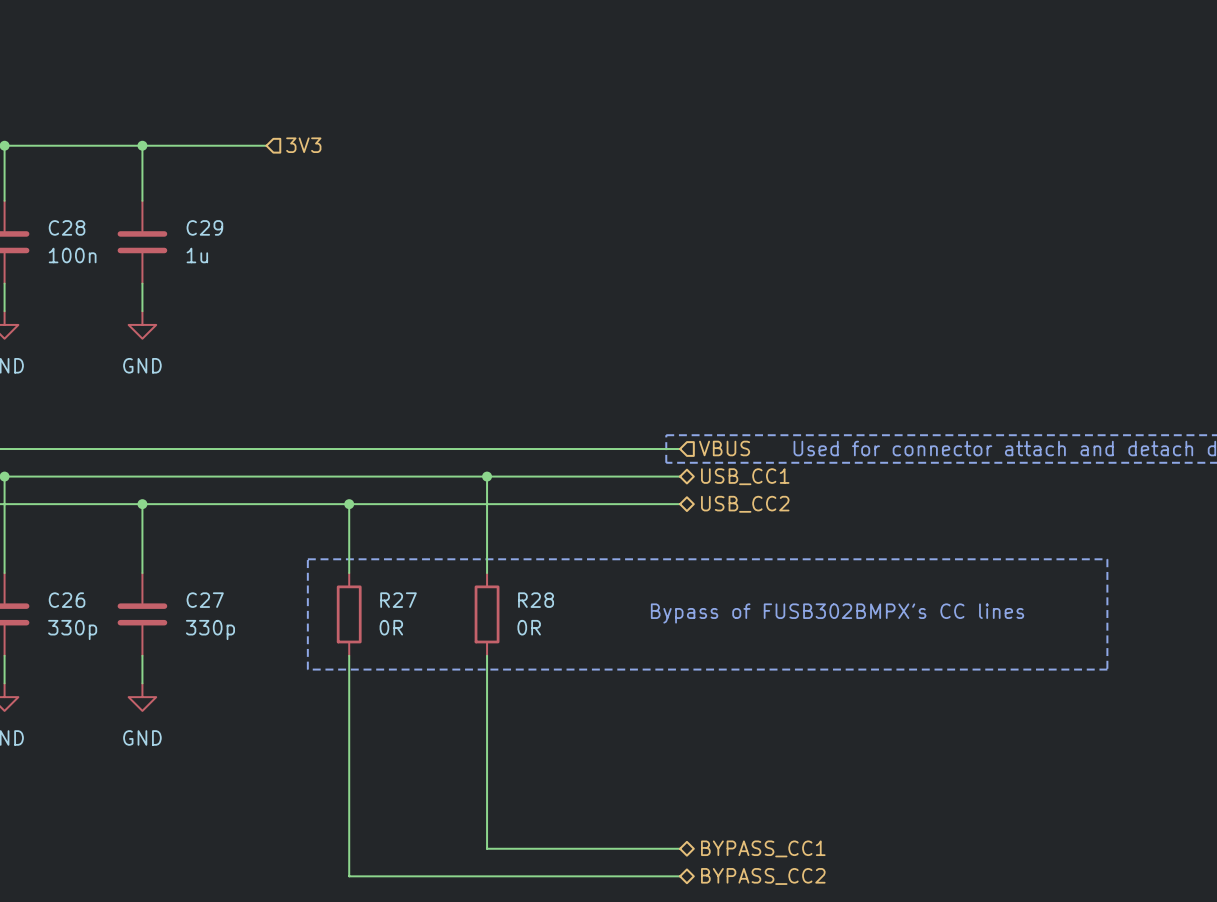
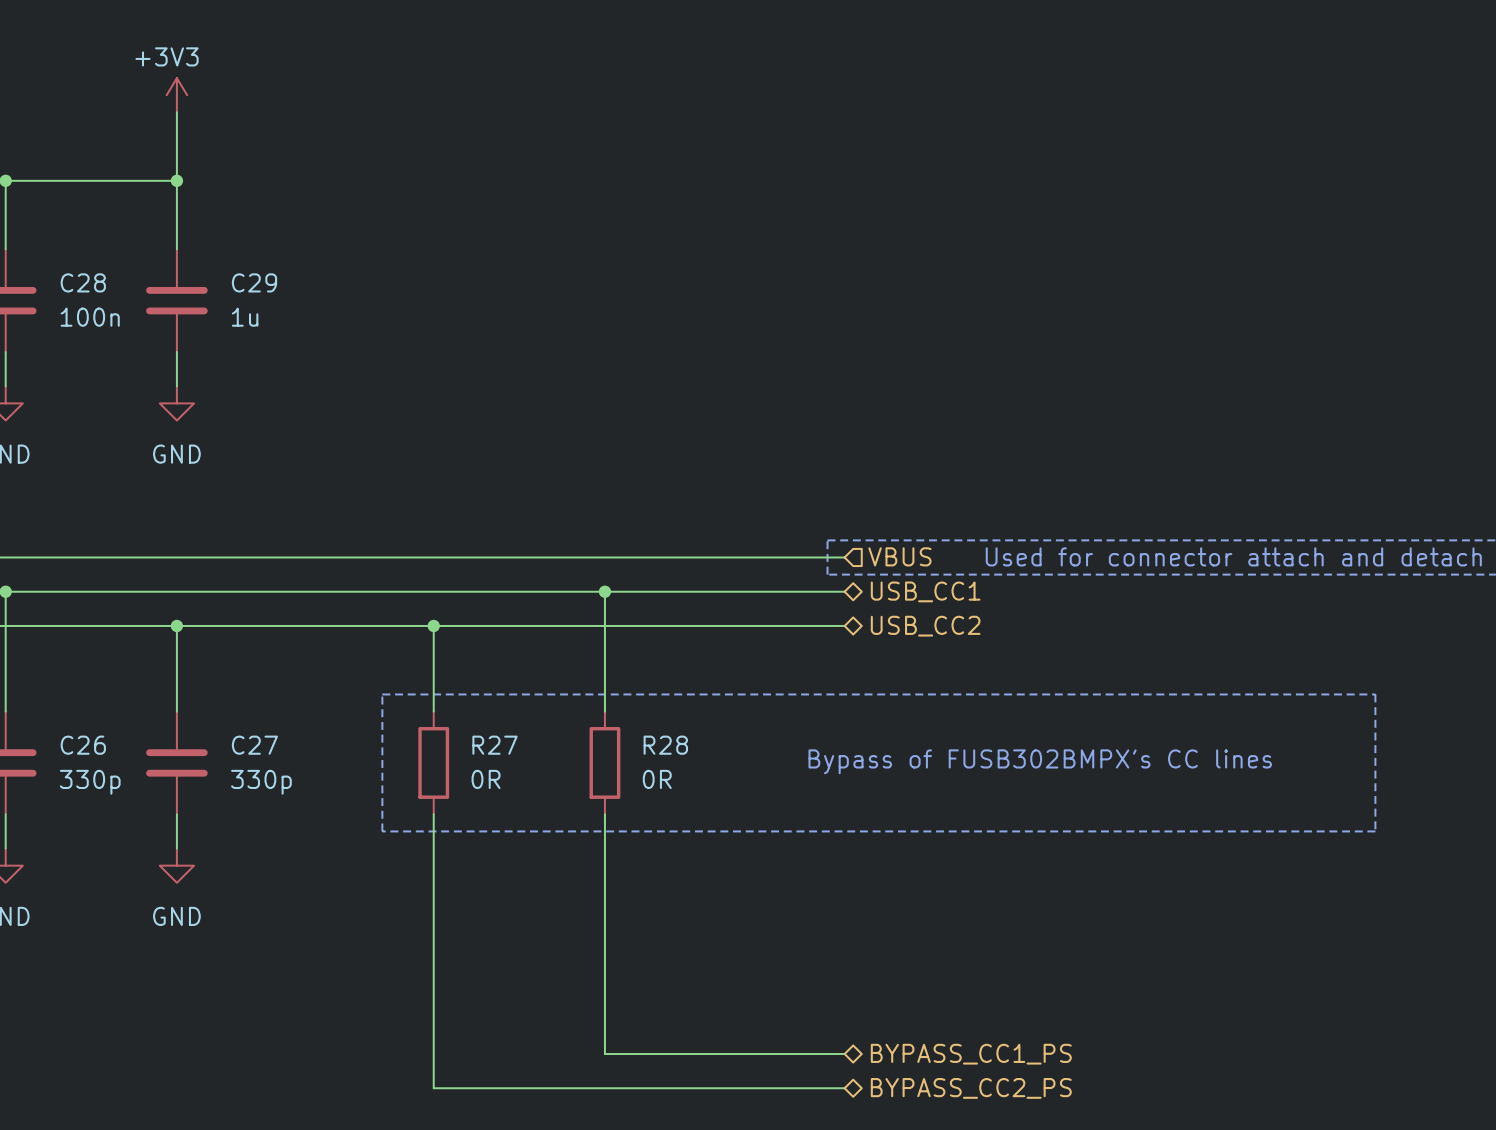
power symbol: none -> +3V3 (176, 95)
wire: (142, 145) (266, 145) -> (176, 180) (176, 112)
hierarchical label: 3V3 (303, 145) -> none
hierarchical label: BYPASS_CC1 (763, 848) -> BYPASS_CC1_PS (971, 1054)
hierarchical label: BYPASS_CC2 (763, 876) -> BYPASS_CC2_PS (971, 1088)

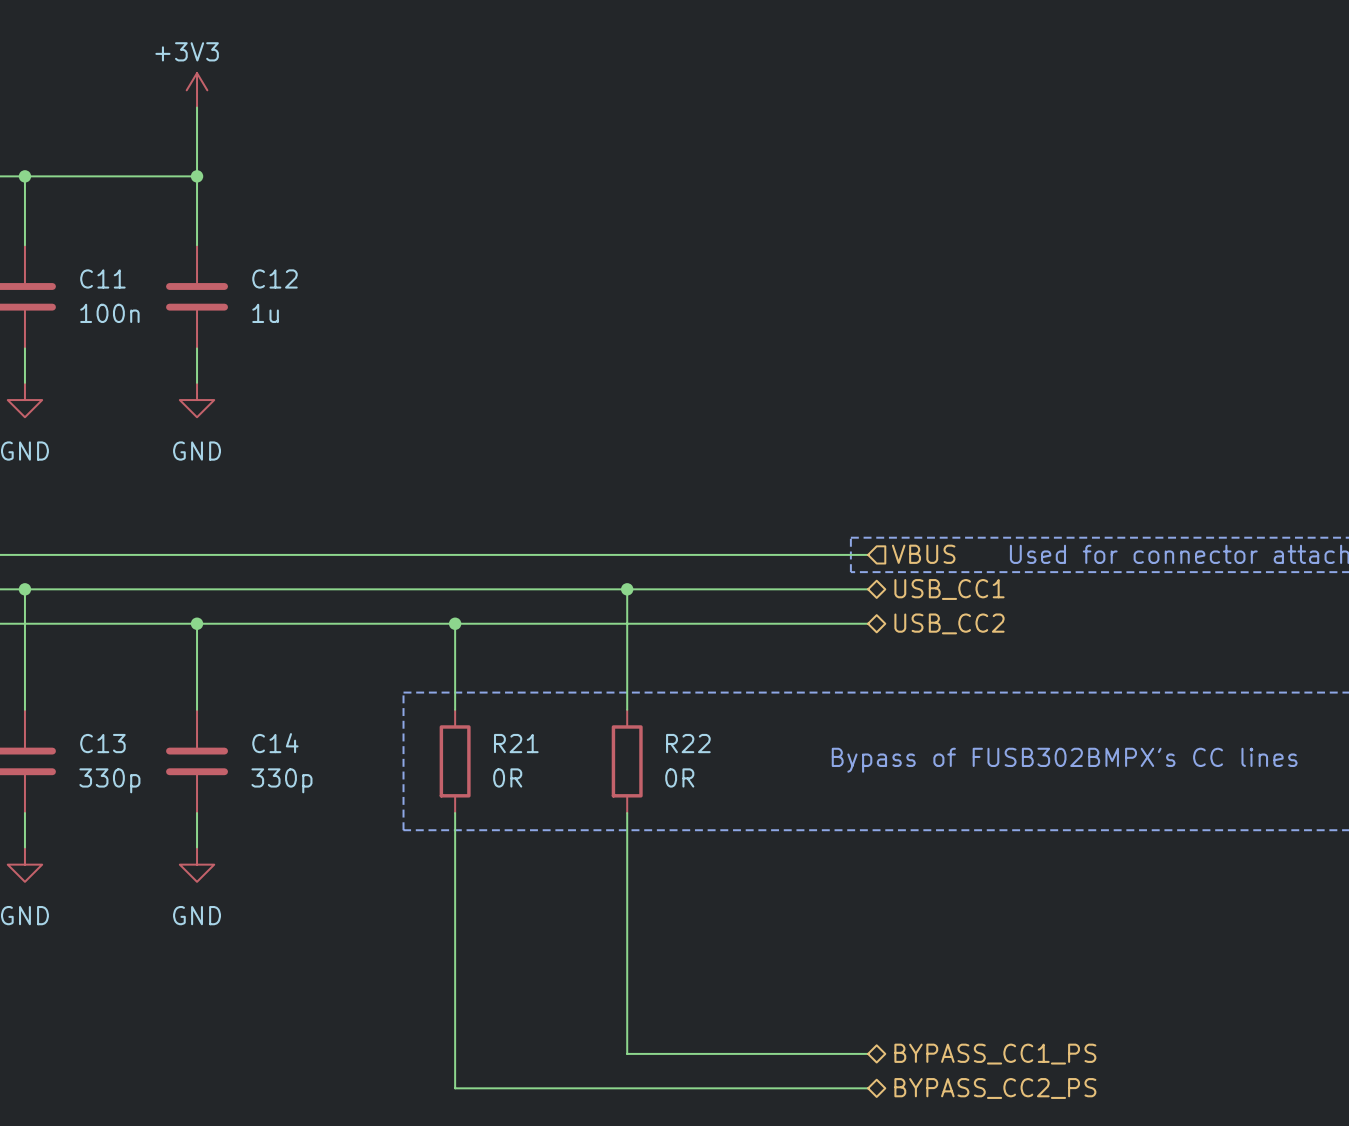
C28 name: C28 (83, 282) -> C11 (102, 278)
C29 name: C29 (254, 282) -> C12 (275, 278)
C26 name: C26 (83, 745) -> C13 (102, 743)
C27 name: C27 (254, 745) -> C14 (275, 743)
R27 name: R27 (495, 745) -> R21 (516, 743)
R28 name: R28 (665, 745) -> R22 (688, 743)

